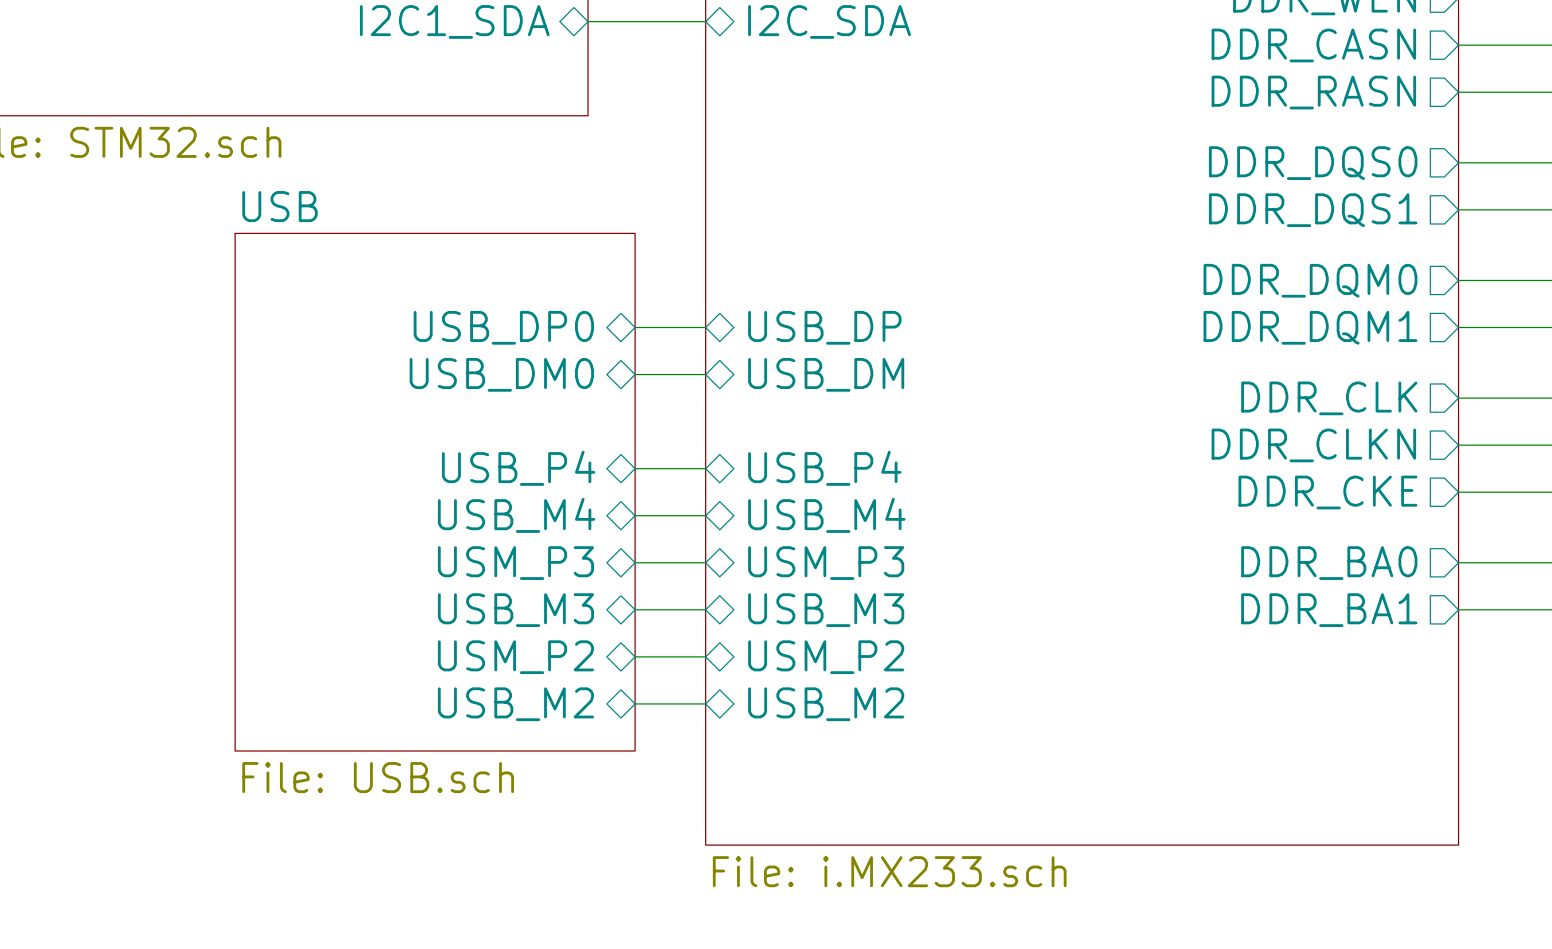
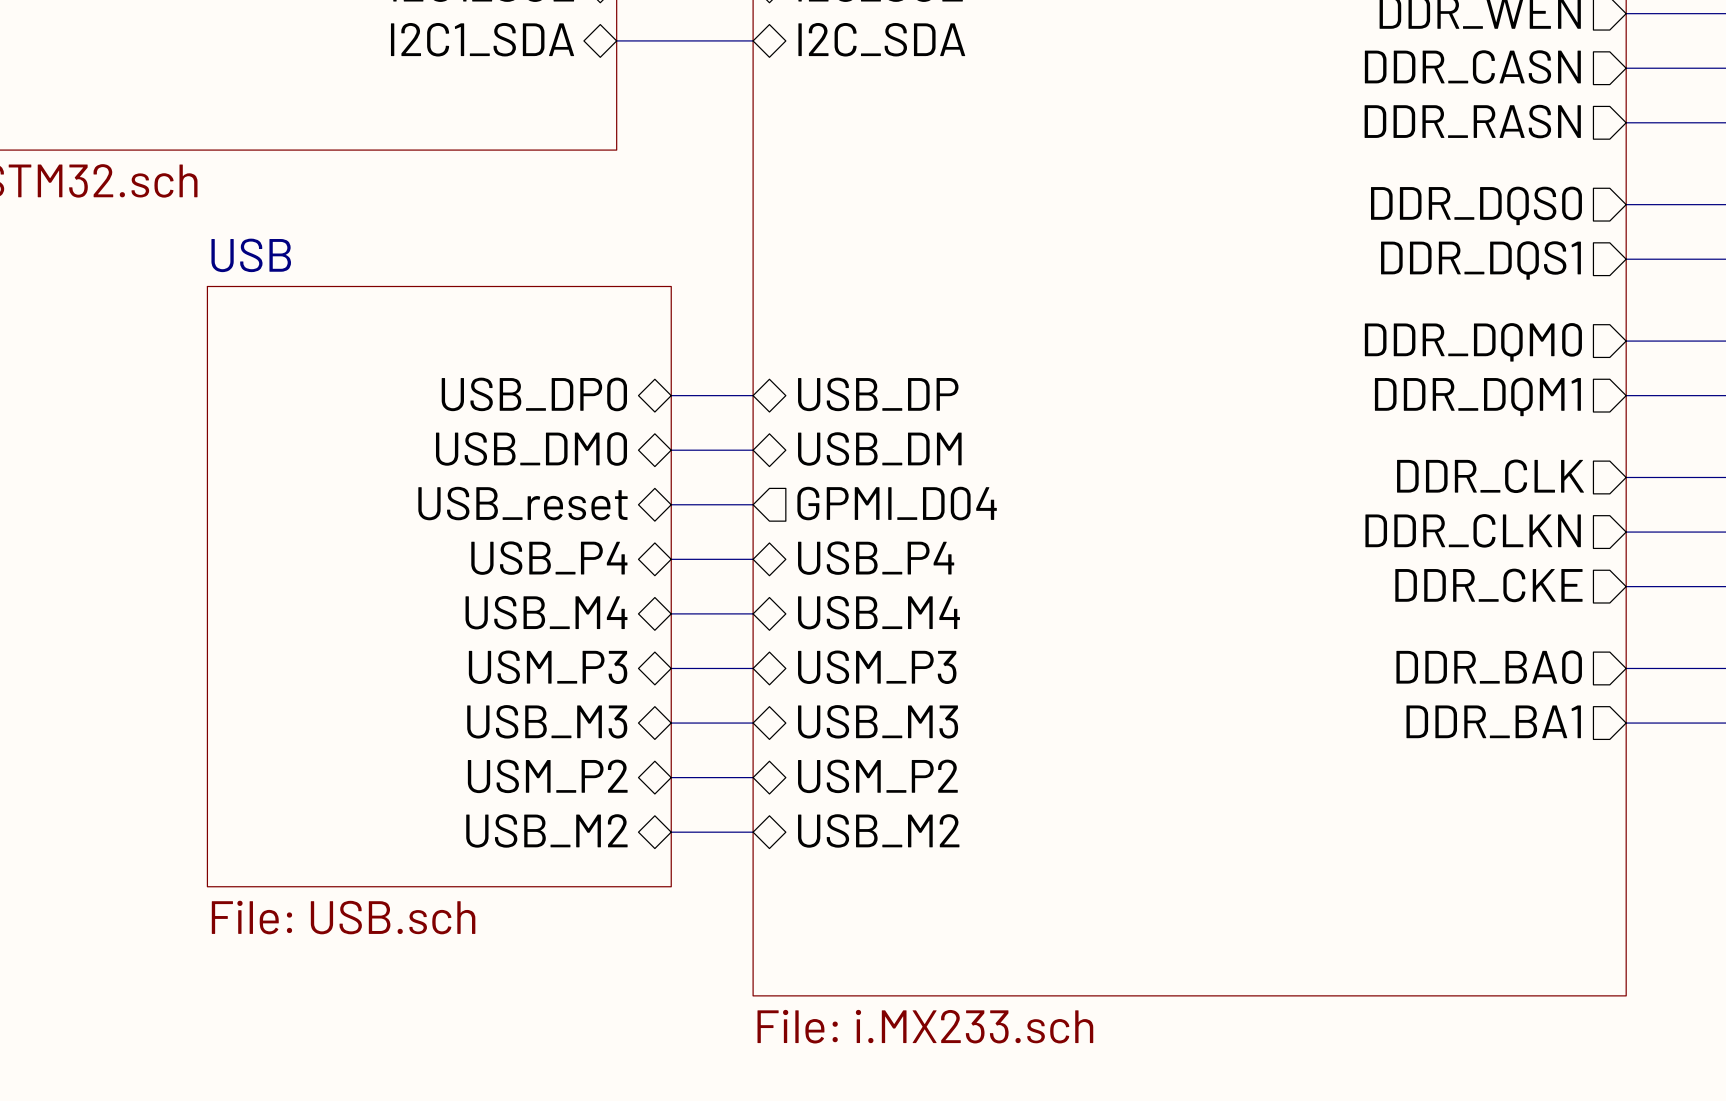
sheet pin: none -> USB_reset (523, 503)
wire: none -> (671, 504) (753, 504)
sheet pin: none -> GPMI_D04 (897, 503)

